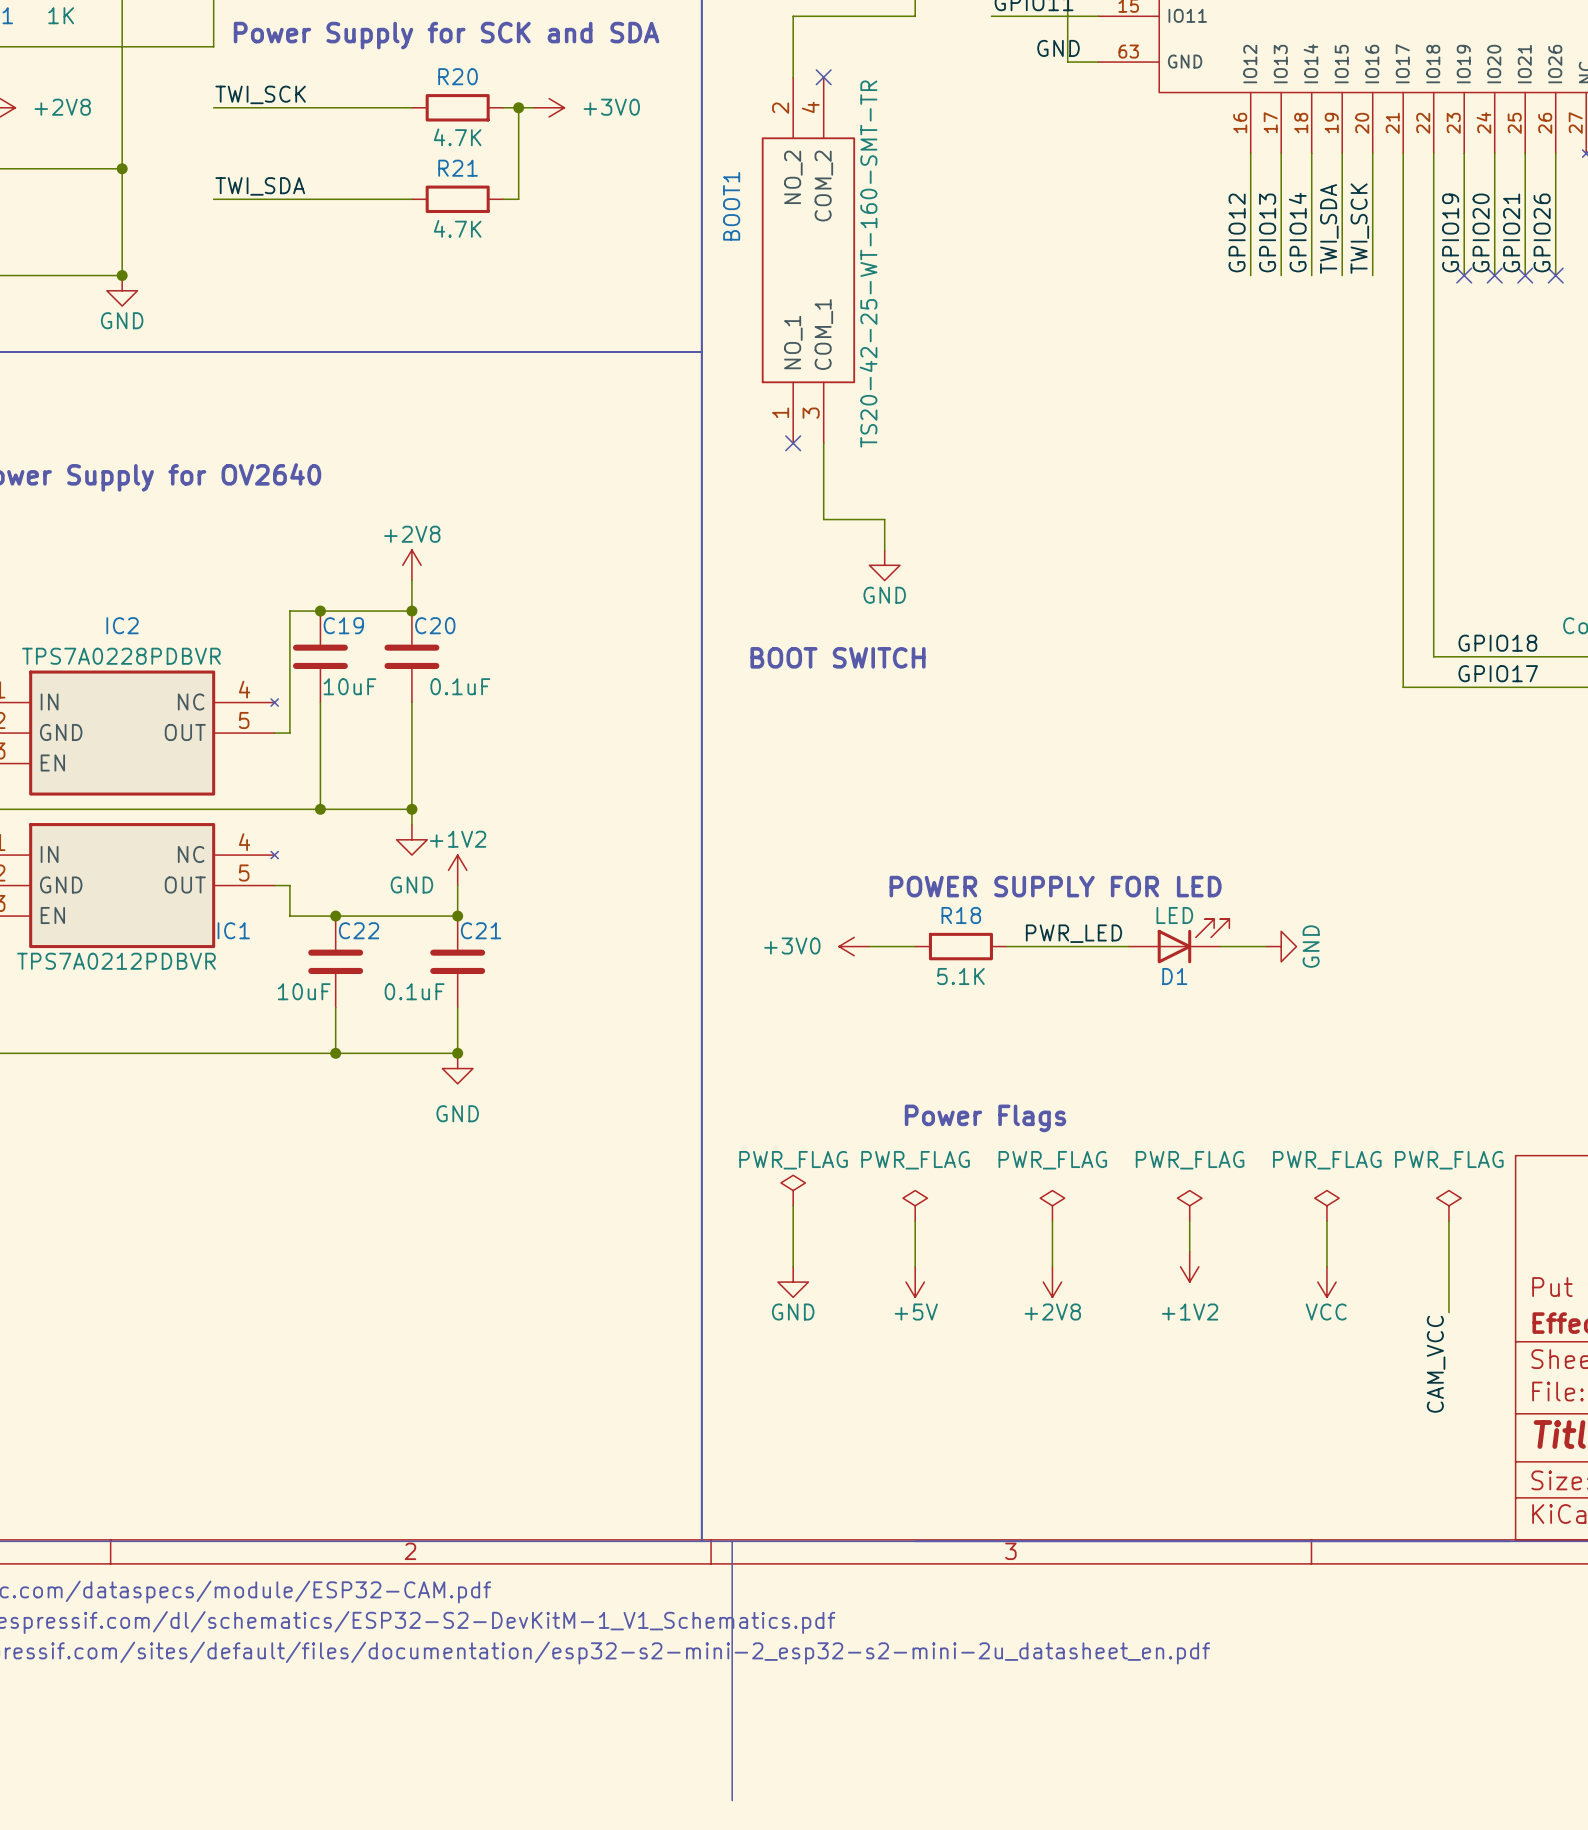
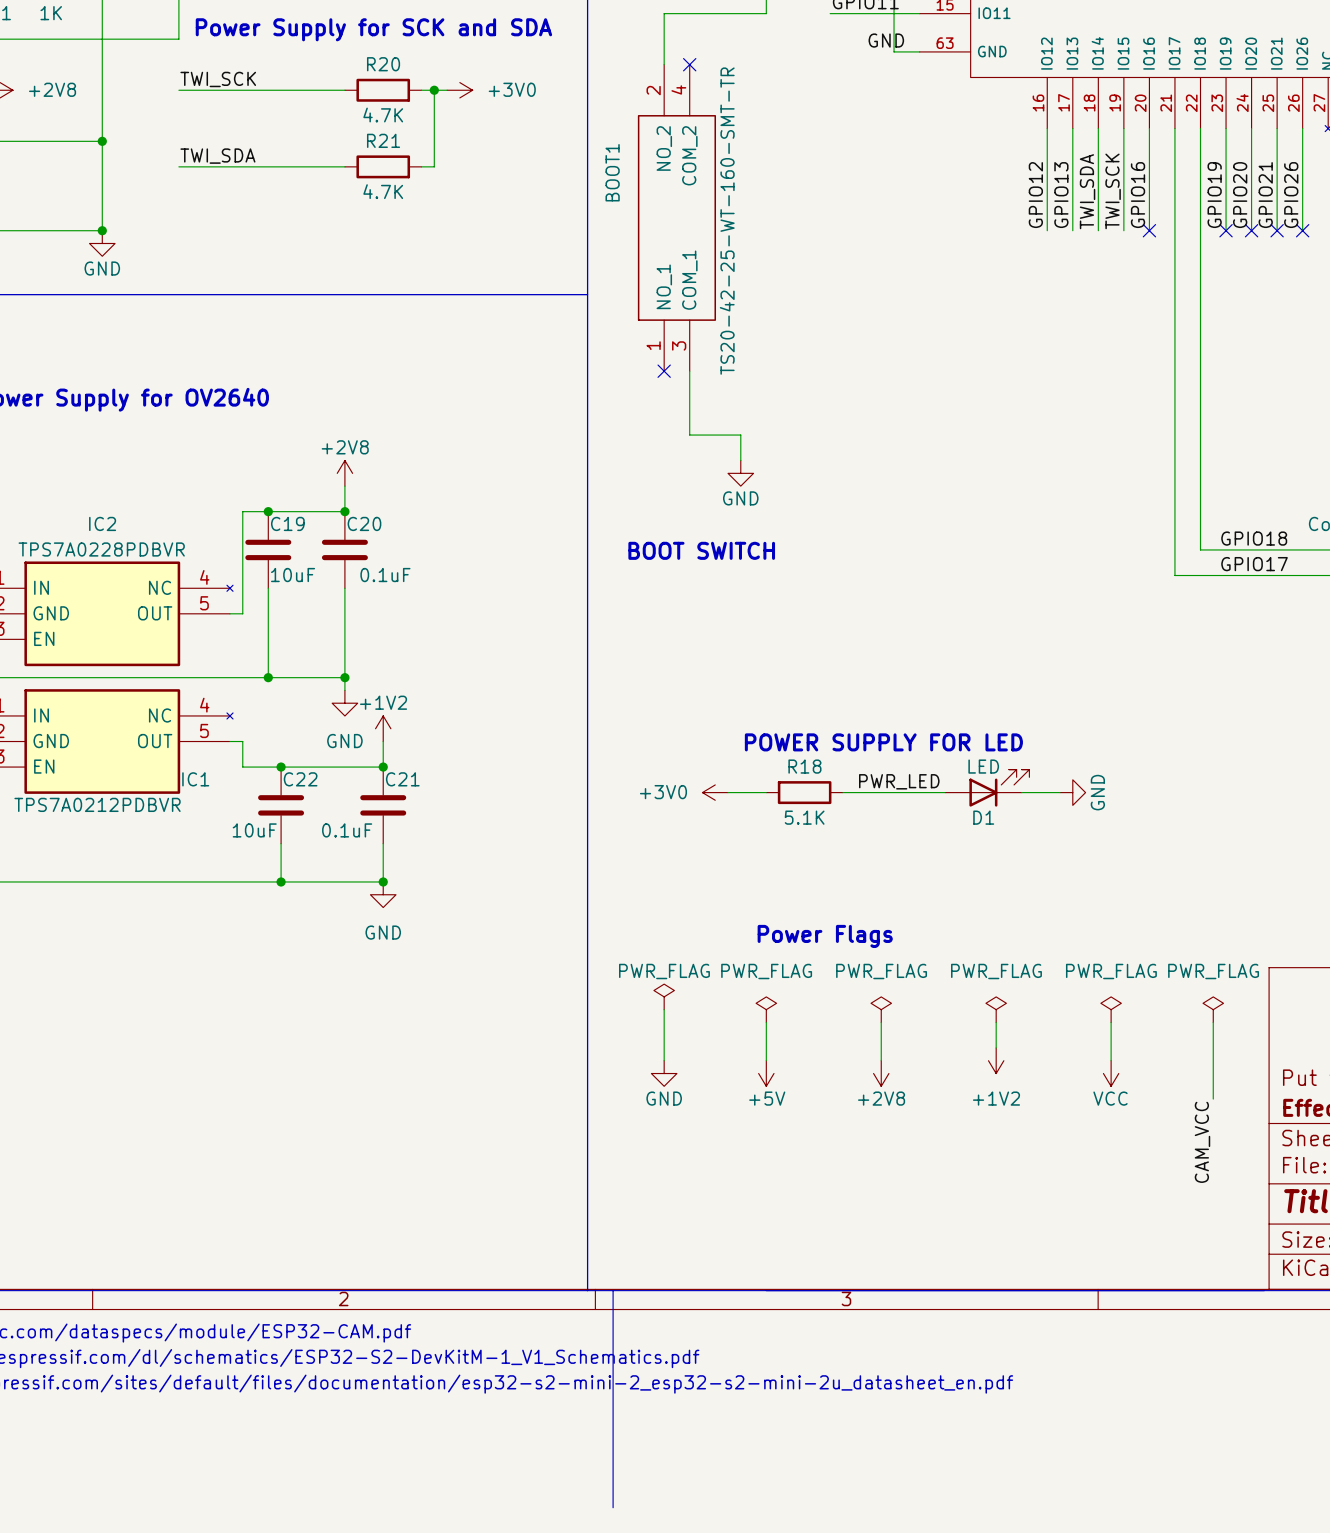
label: TWI_SDA (1329, 228) -> TWI_SCK (1113, 191)
label: TWI_SCK (1359, 228) -> GPIO16 (1138, 195)
label: GPIO14 (1297, 232) -> TWI_SDA (1087, 191)
no-connect mark: none -> (1149, 230)

